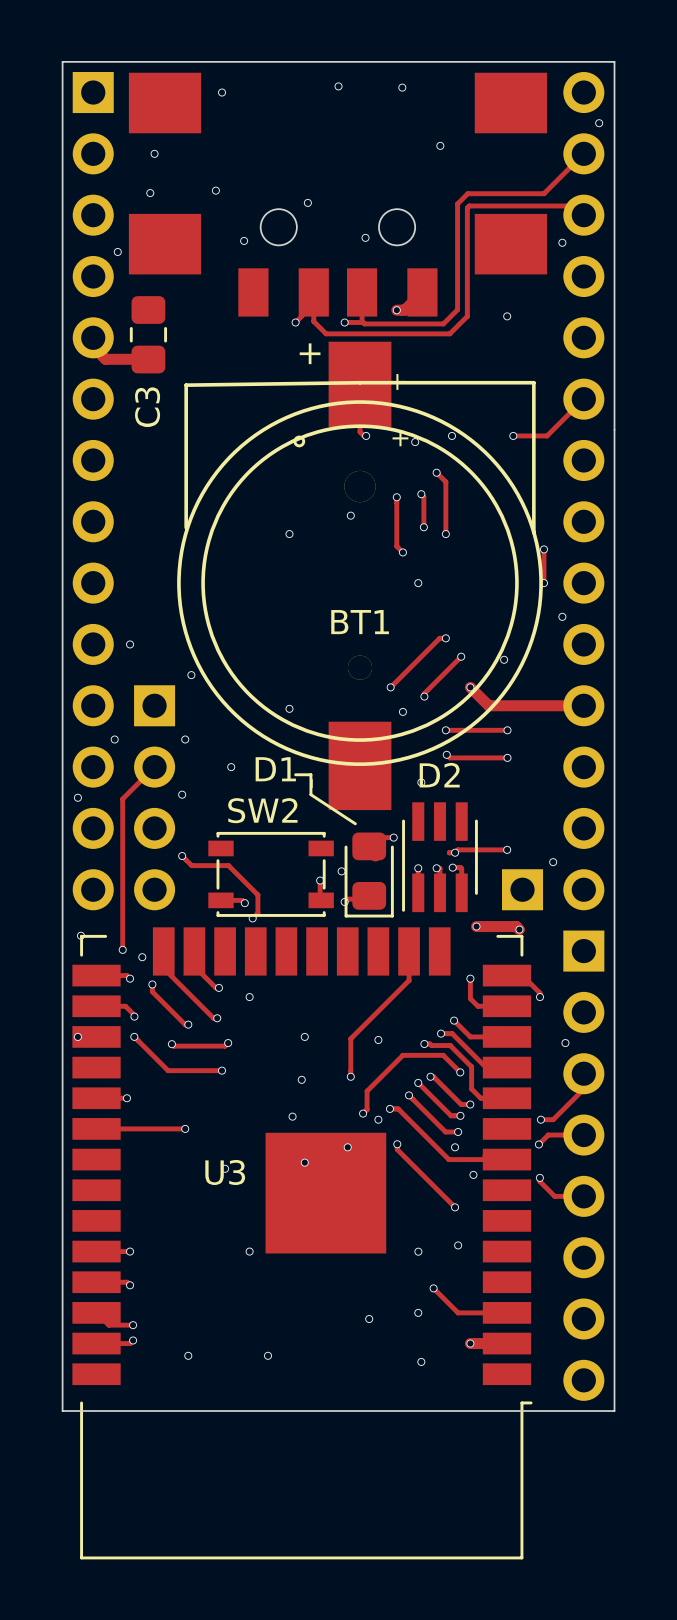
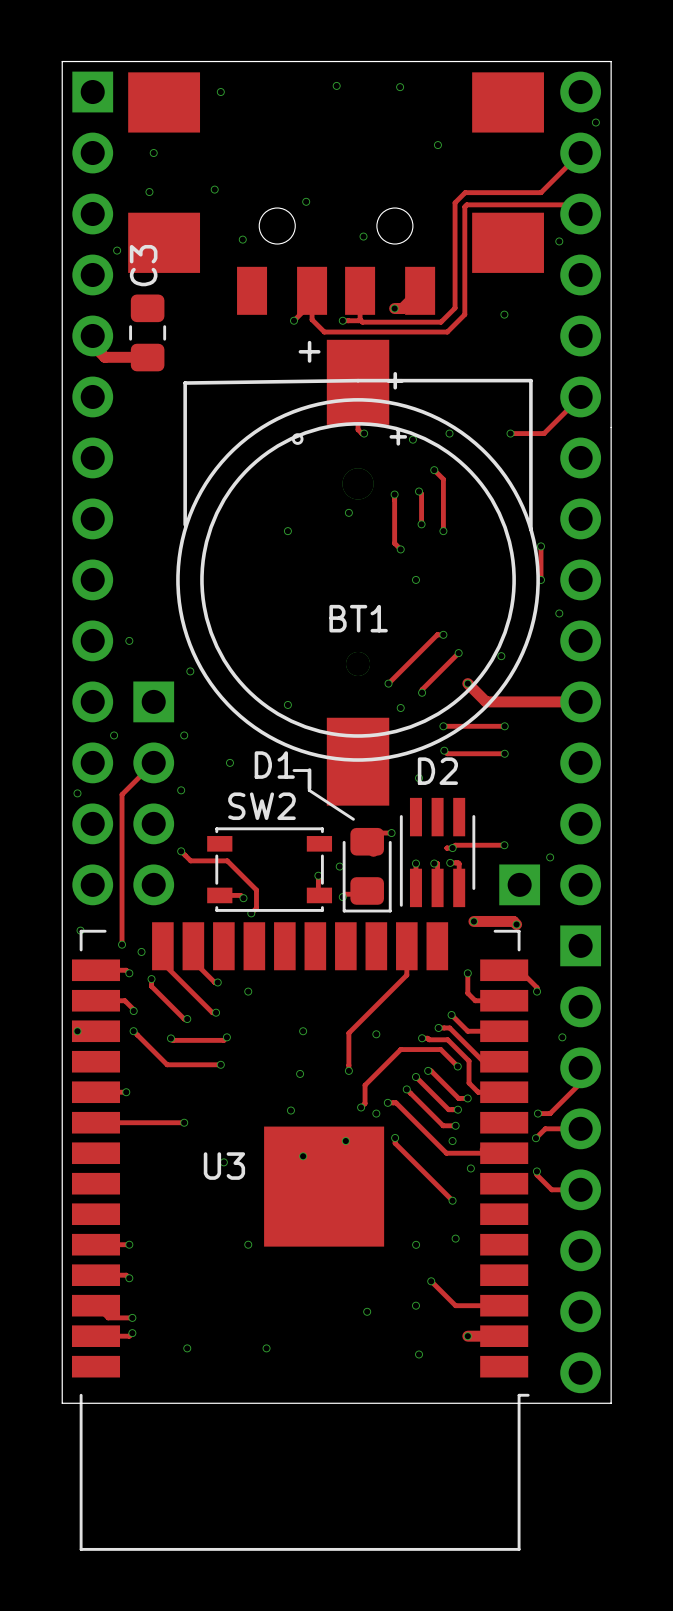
C3 name position: C3 (147, 407) -> C3 (143, 265)

